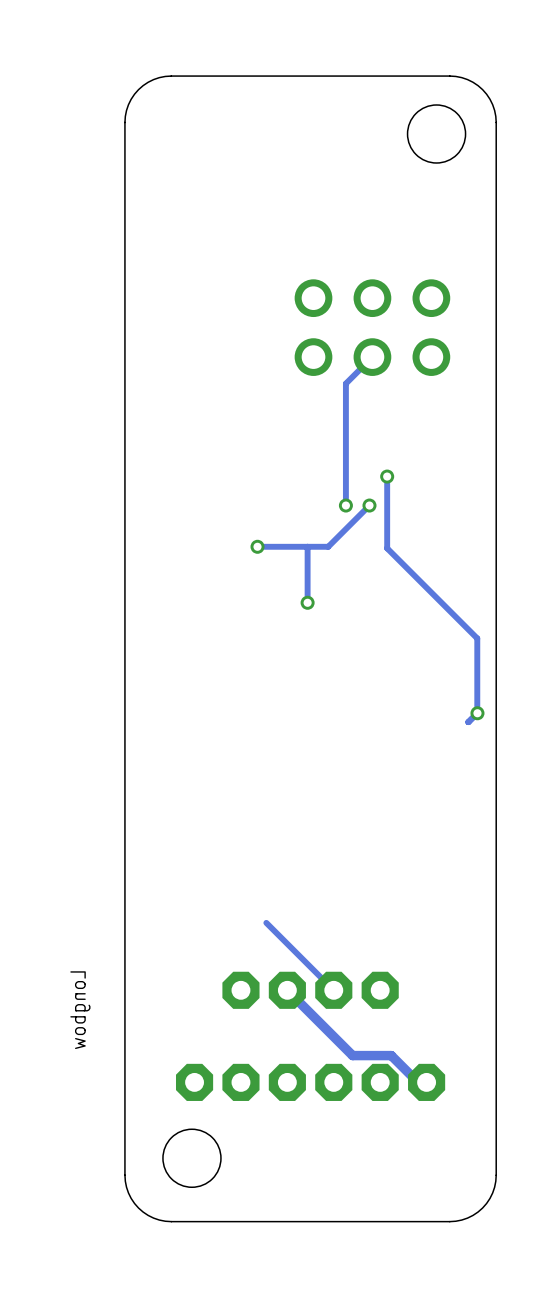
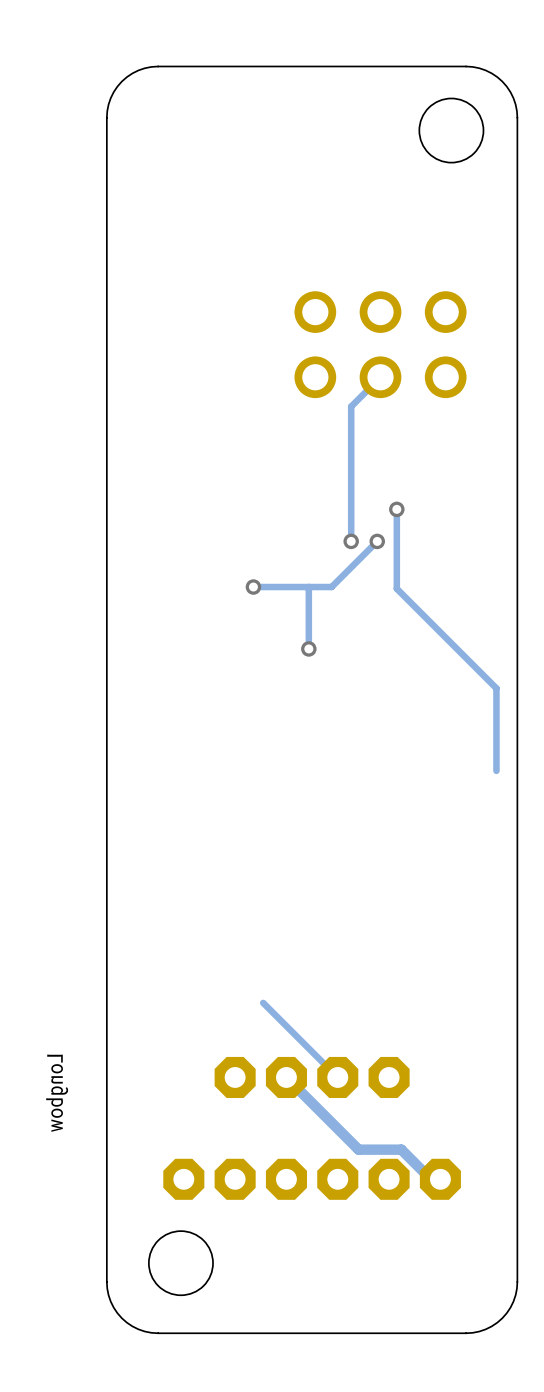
via: (477, 713) -> none

